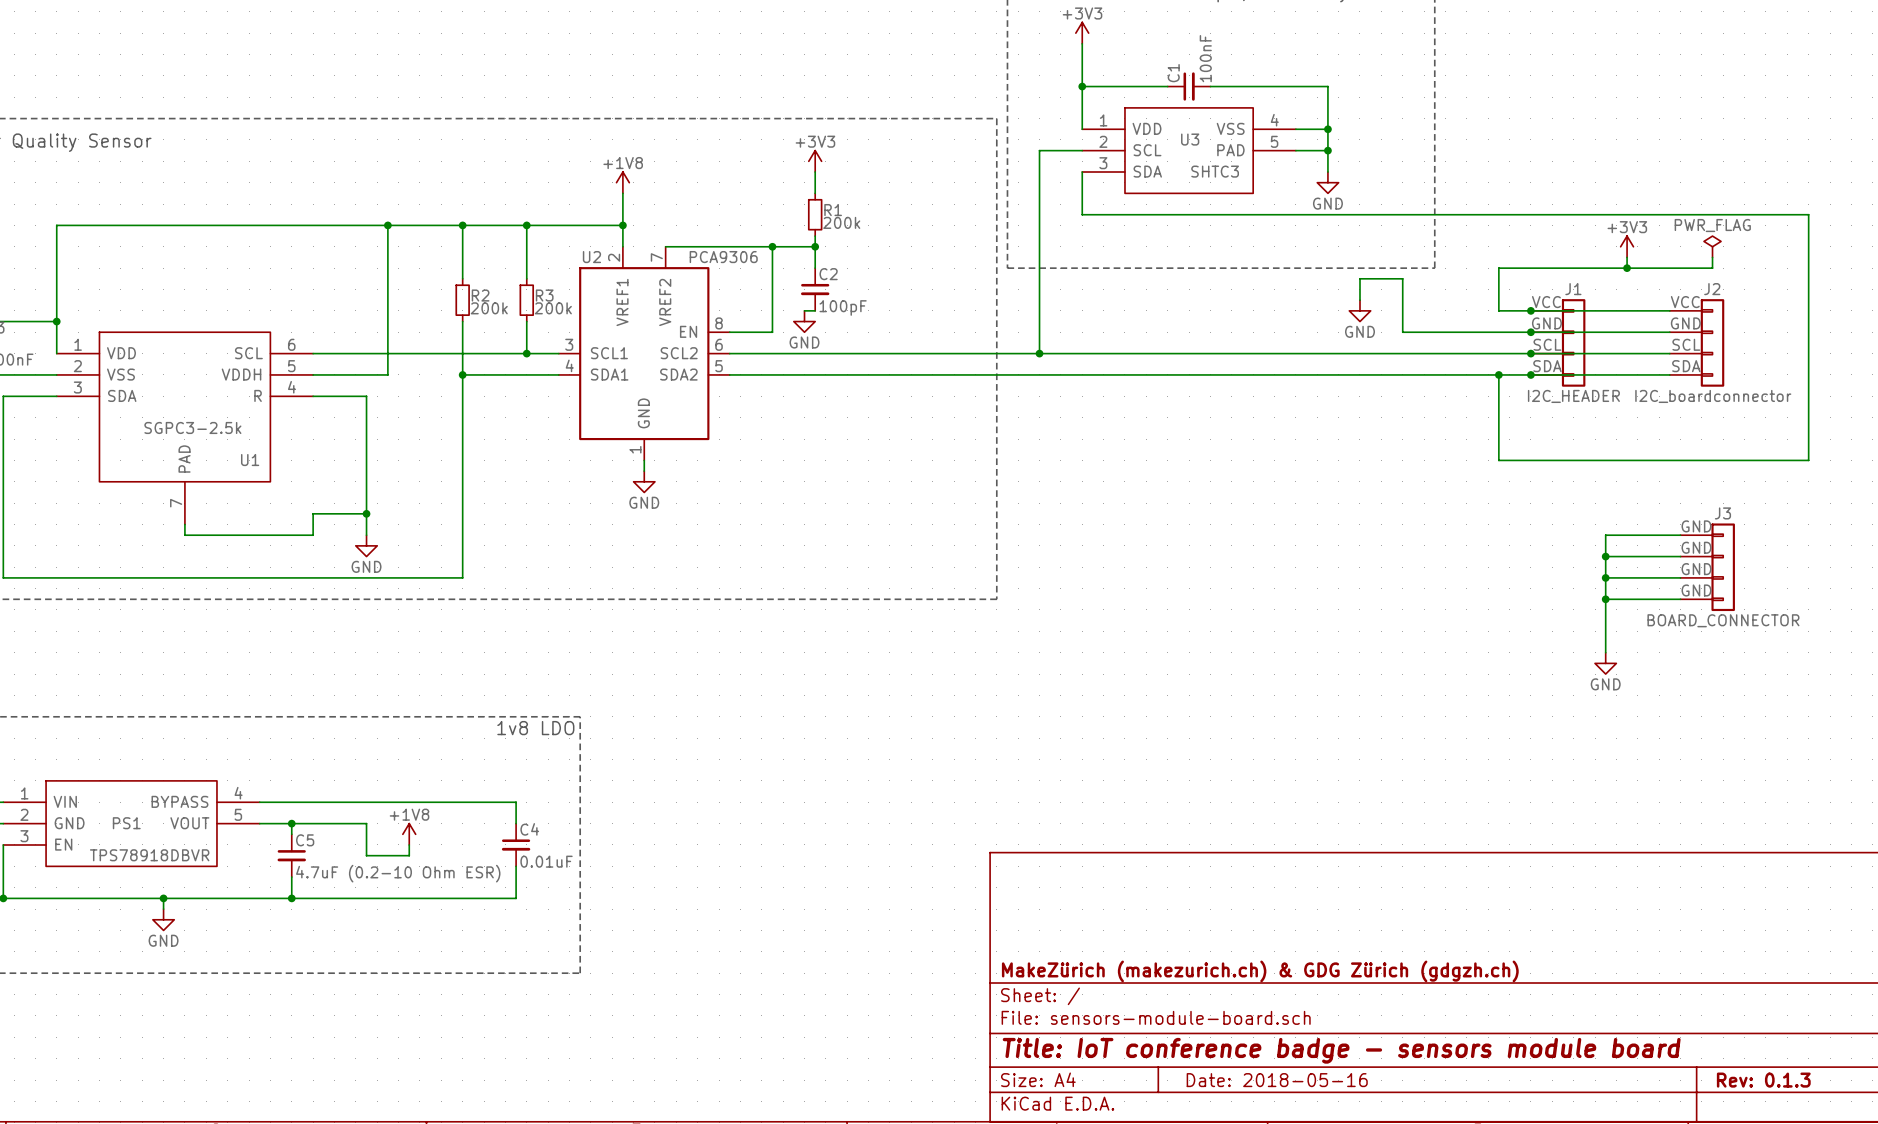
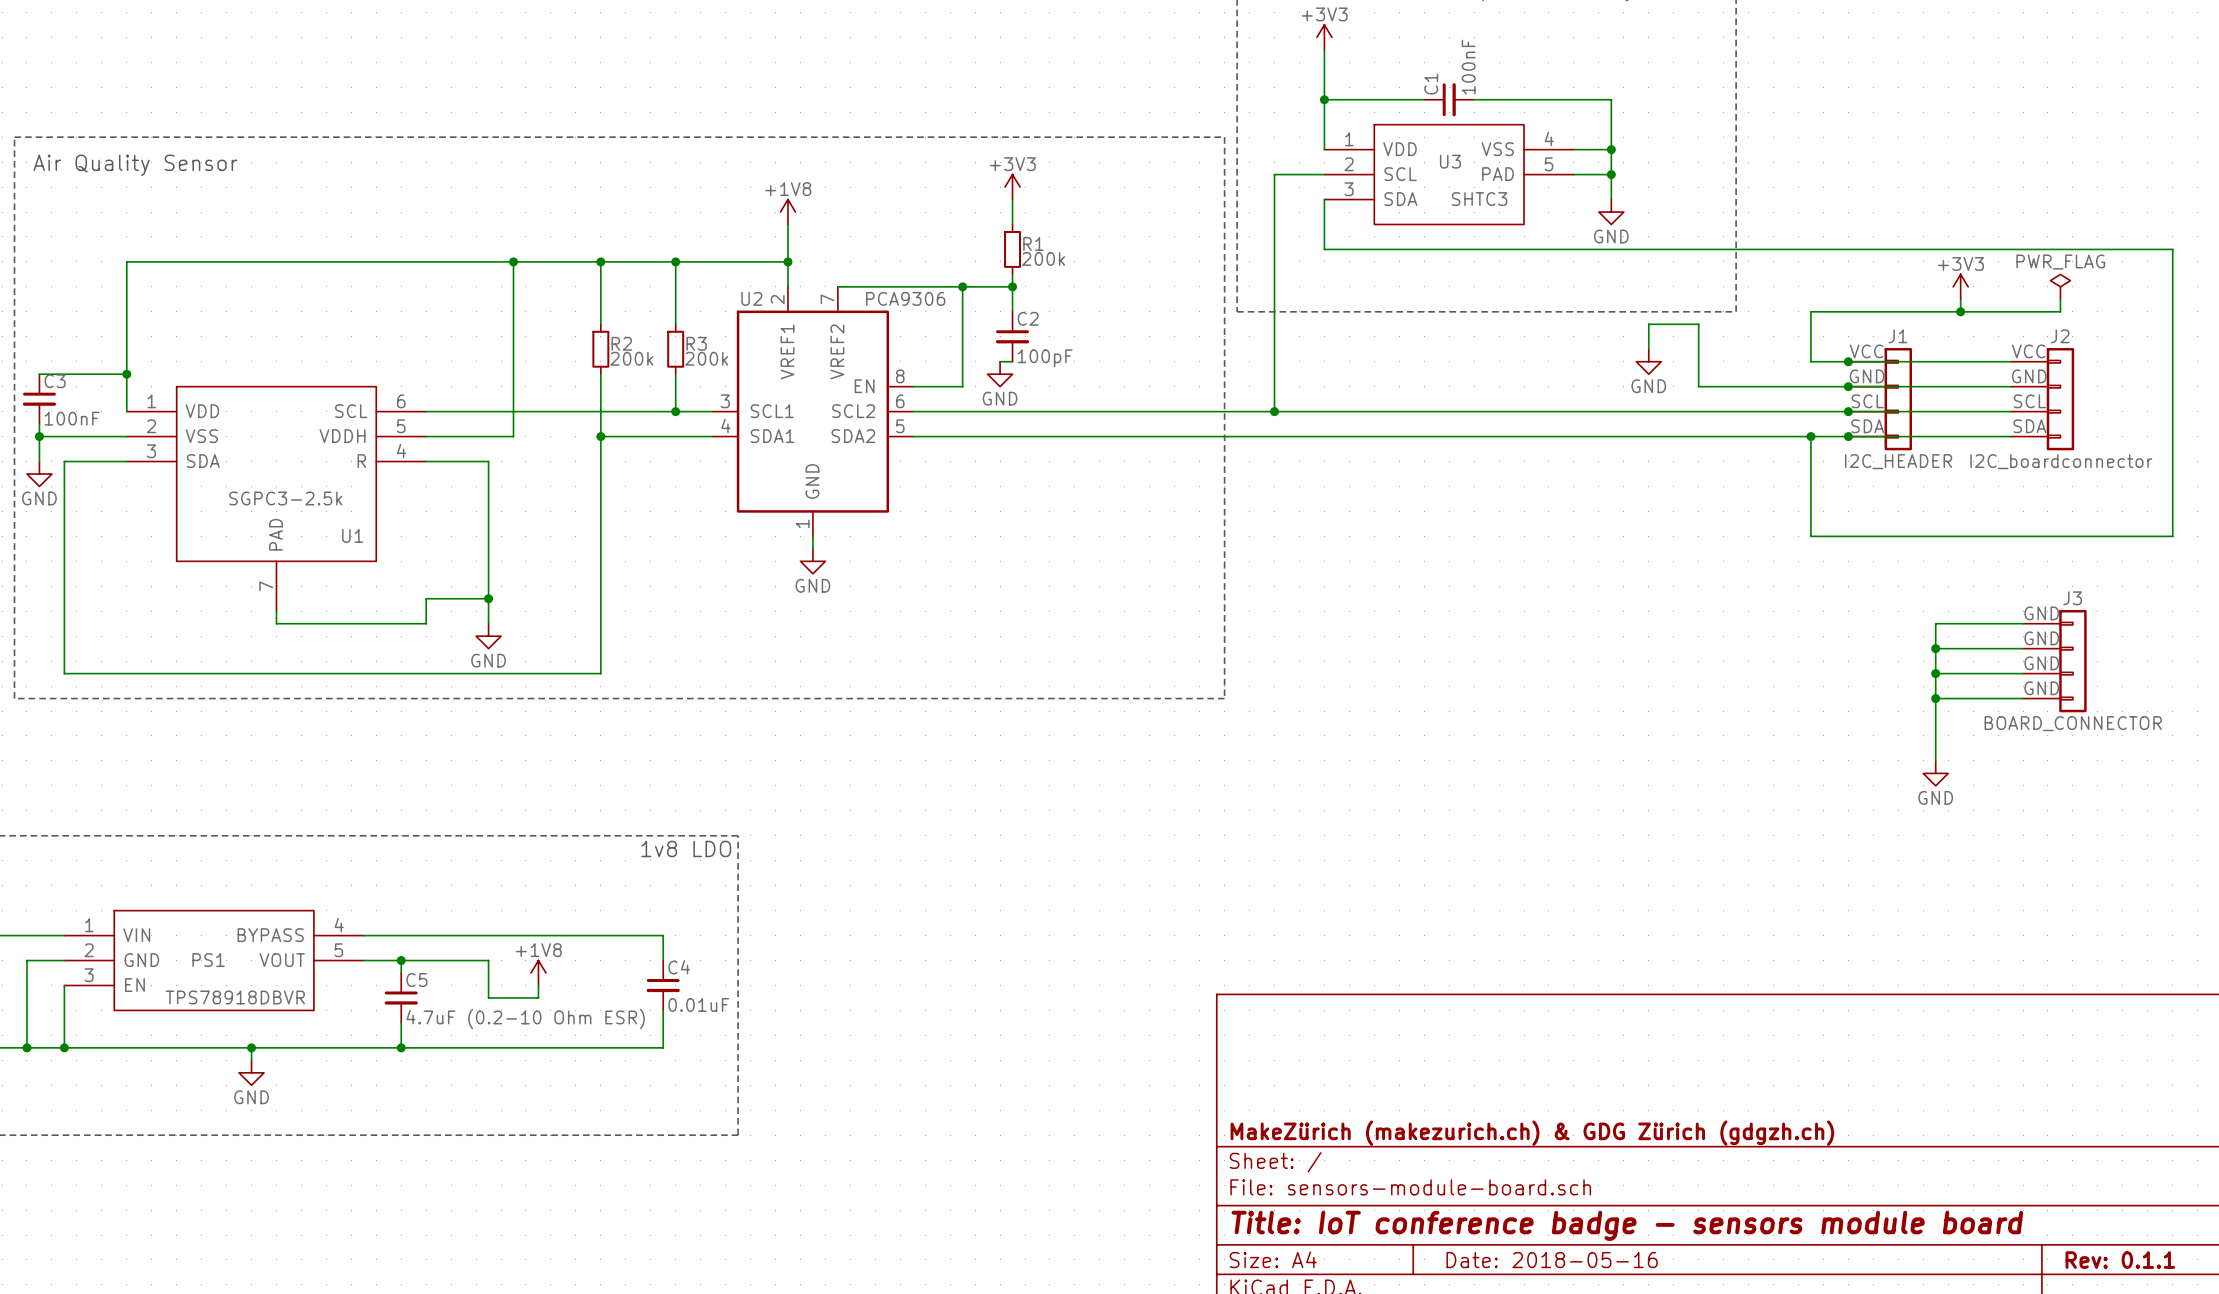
title block: Rev: 0.1.3 (1763, 1080) -> Rev: 0.1.1 (2120, 1260)

